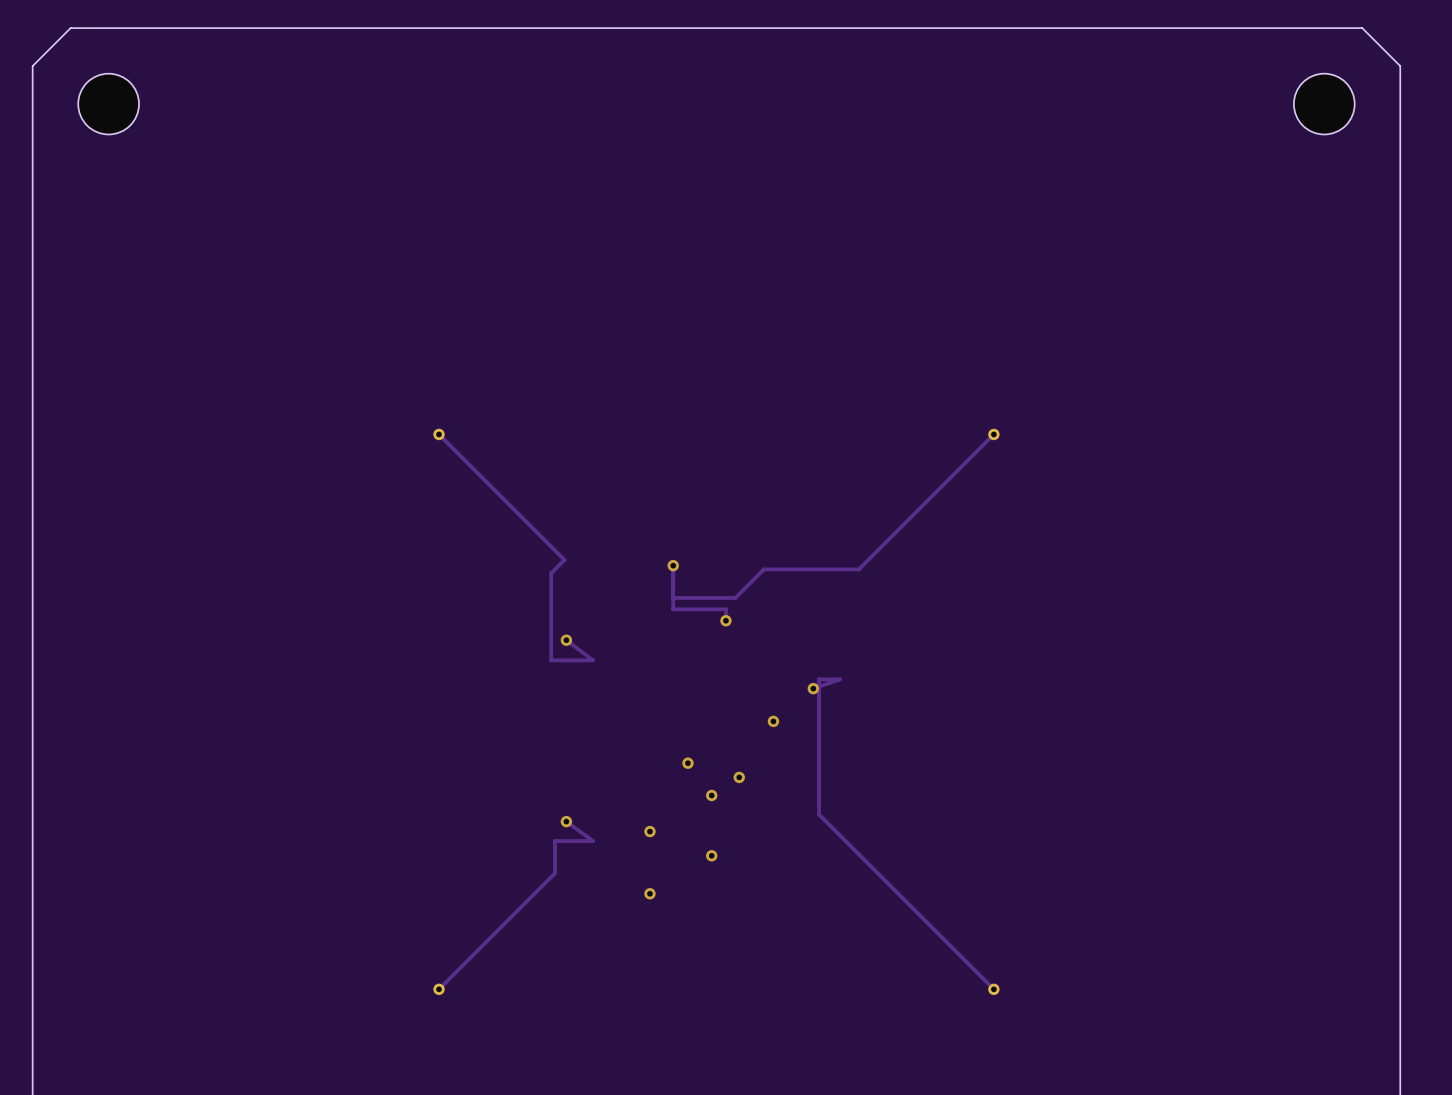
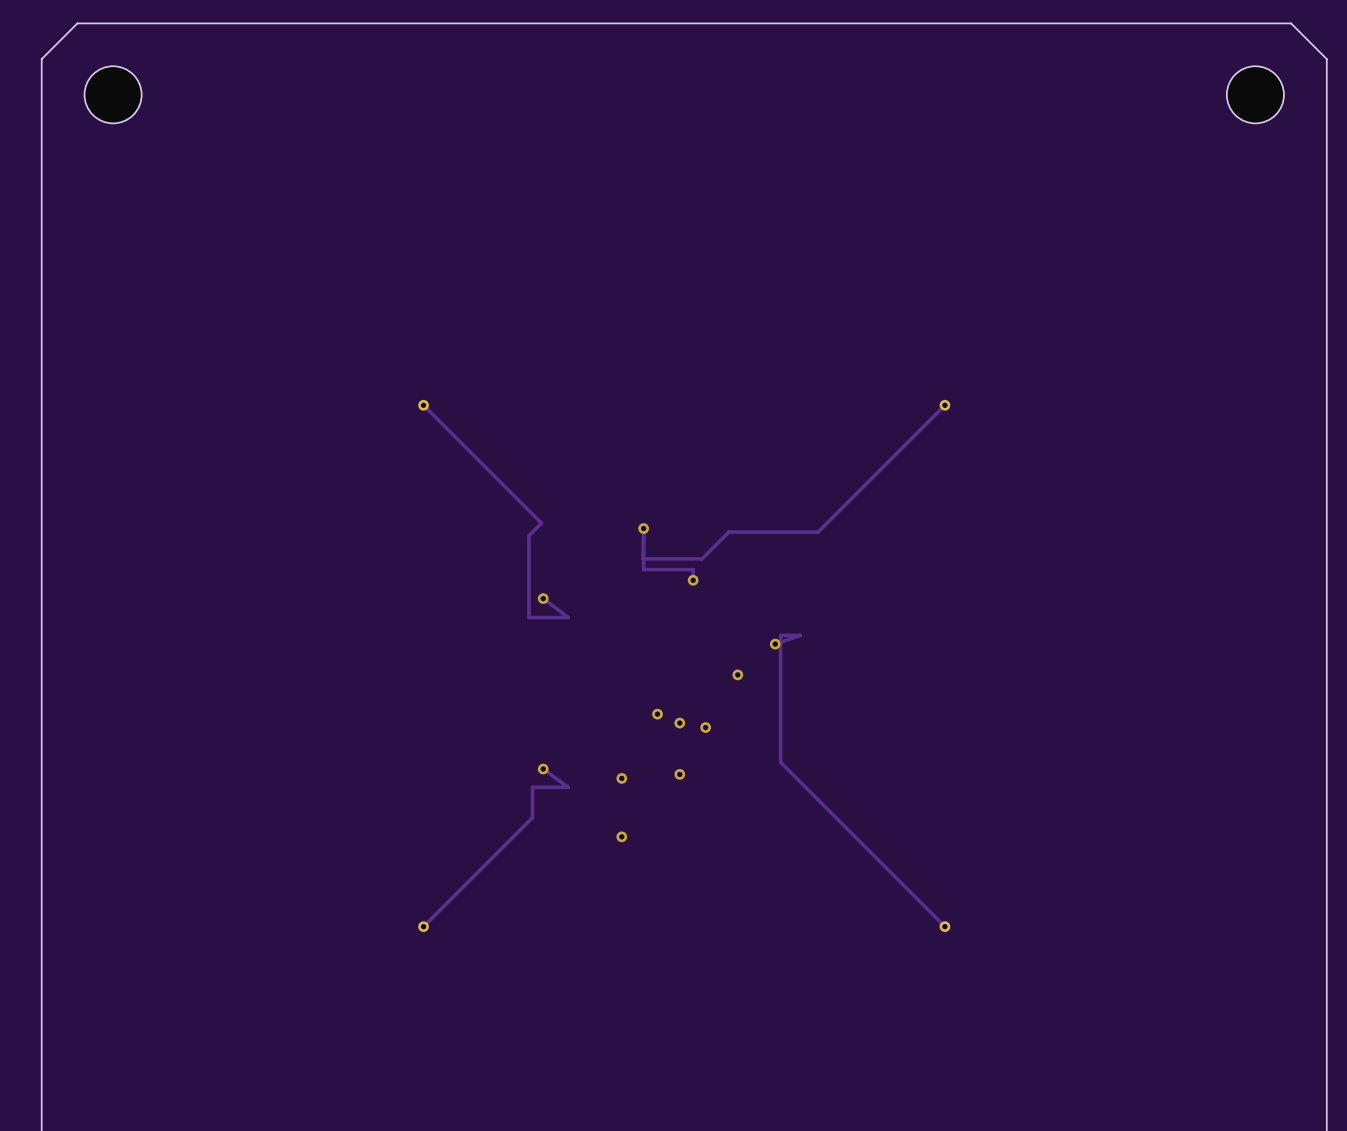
via: none -> (679, 723)
via: (711, 795) -> none
via: none -> (679, 774)
via: (711, 855) -> none

